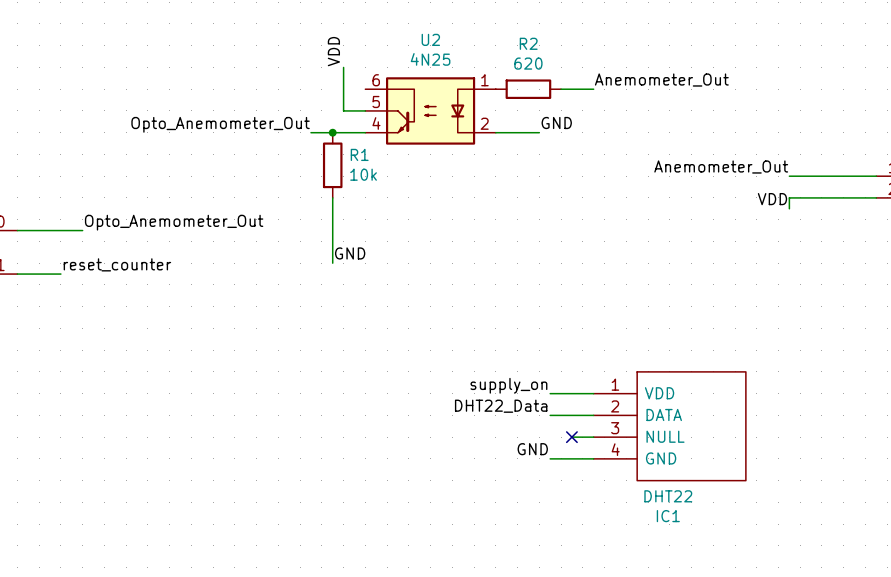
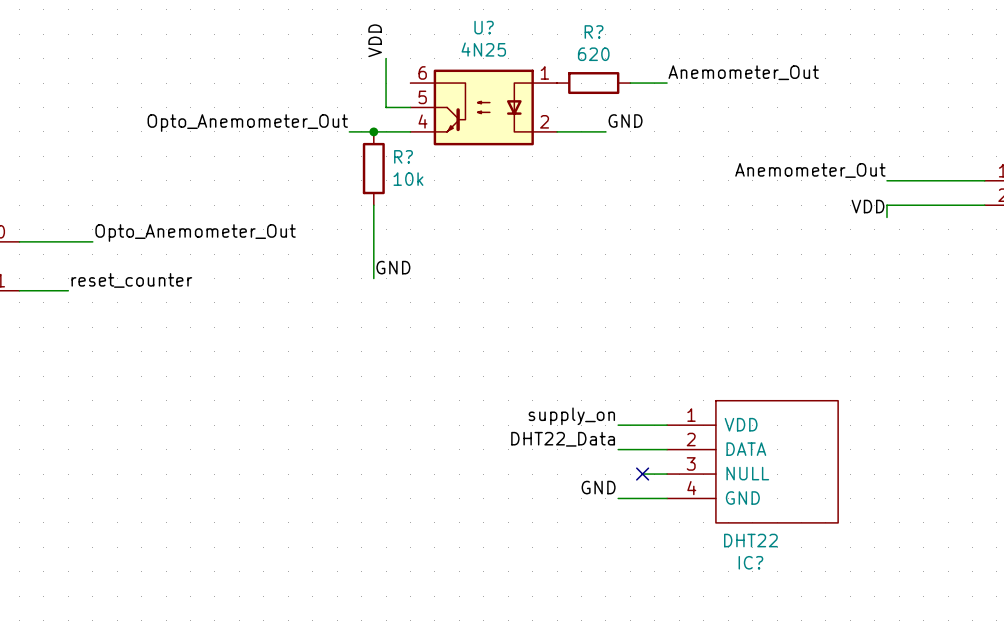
U2 name: U2 (430, 39) -> U? (484, 27)
R2 name: R2 (528, 43) -> R? (594, 31)
R1 name: R1 (359, 154) -> R? (403, 156)
IC1 name: IC1 (668, 516) -> IC? (750, 562)

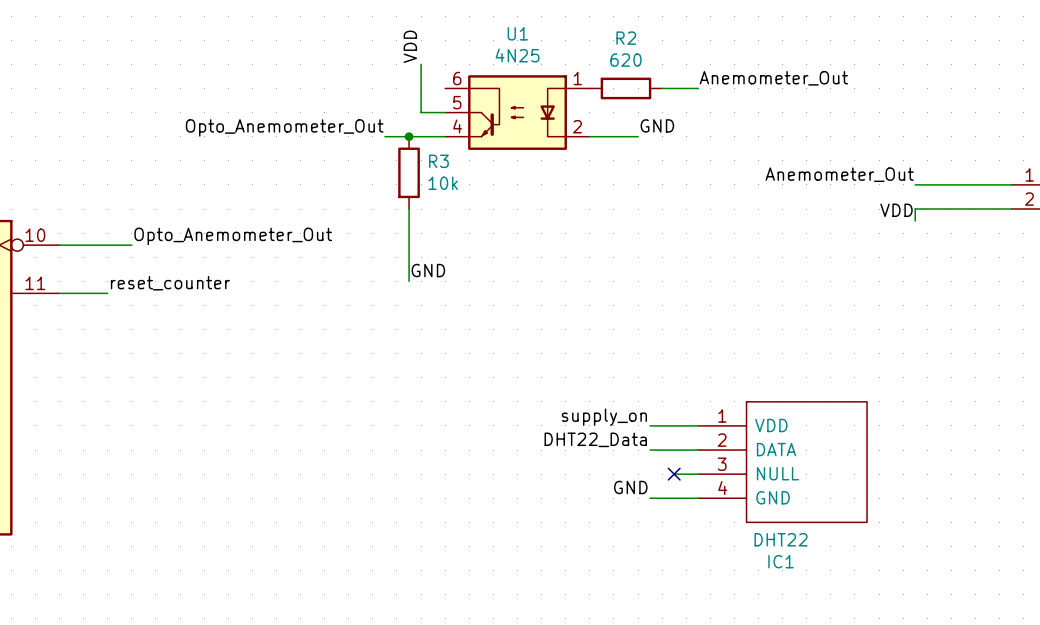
U? name: U? (484, 27) -> U1 (517, 33)
R? name: R? (594, 31) -> R2 (626, 38)
R? name: R? (403, 156) -> R3 (438, 161)
IC? name: IC? (750, 562) -> IC1 (781, 561)

